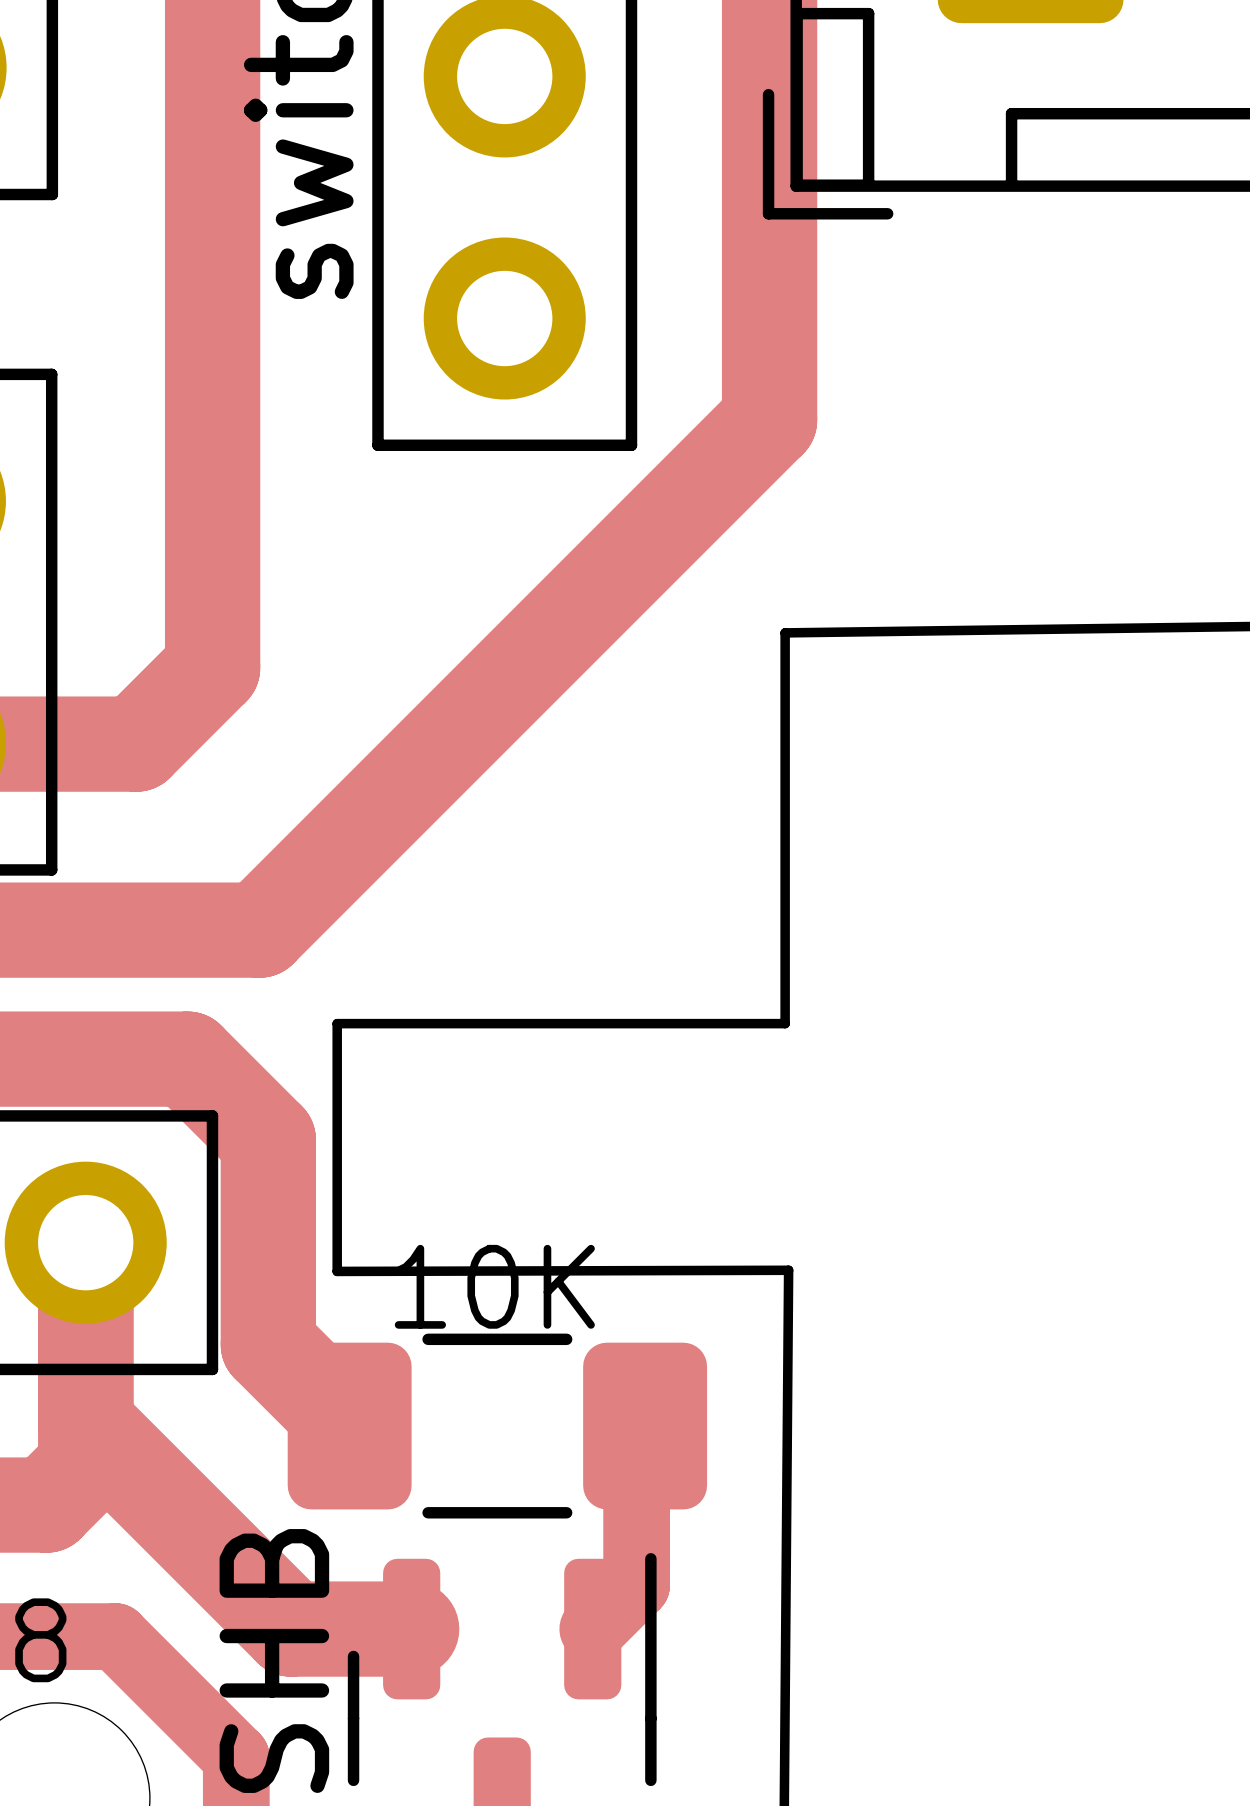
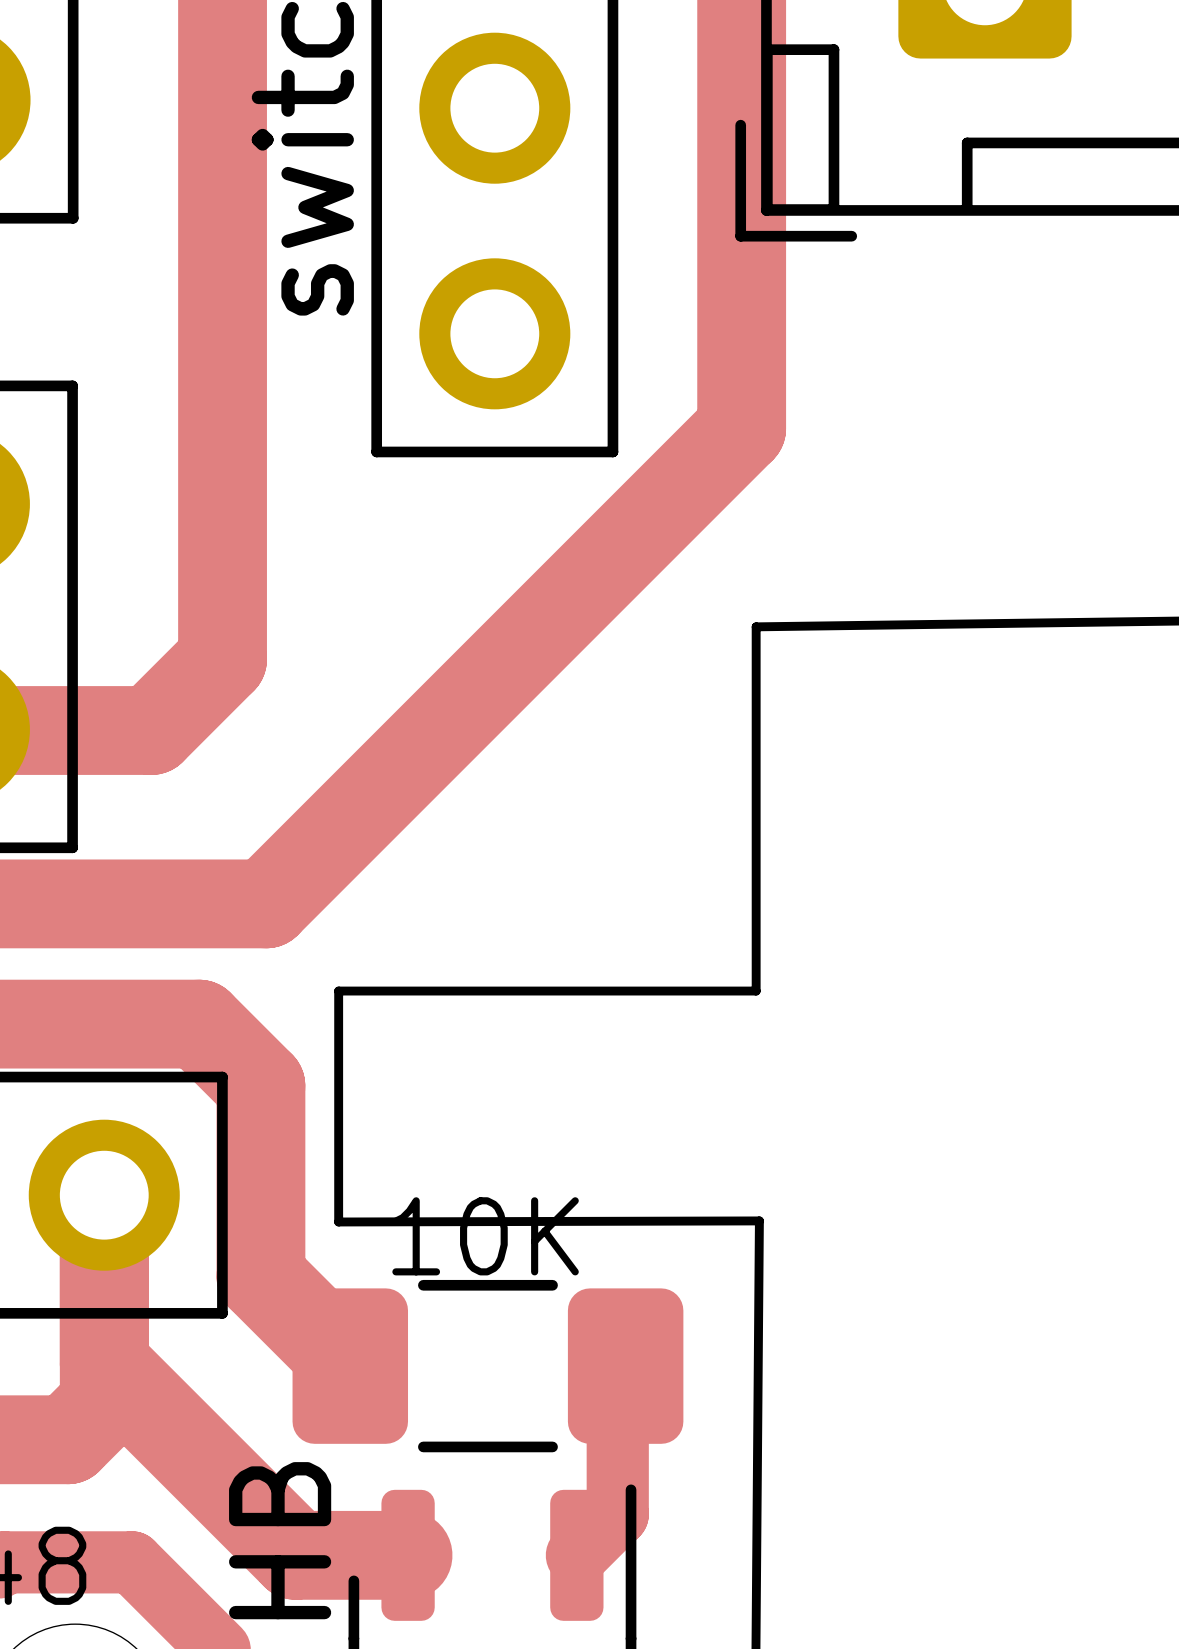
track: (253, 1125) (268, 1139) (268, 1344) -> (260, 1085) (260, 1276) (274, 1290)

